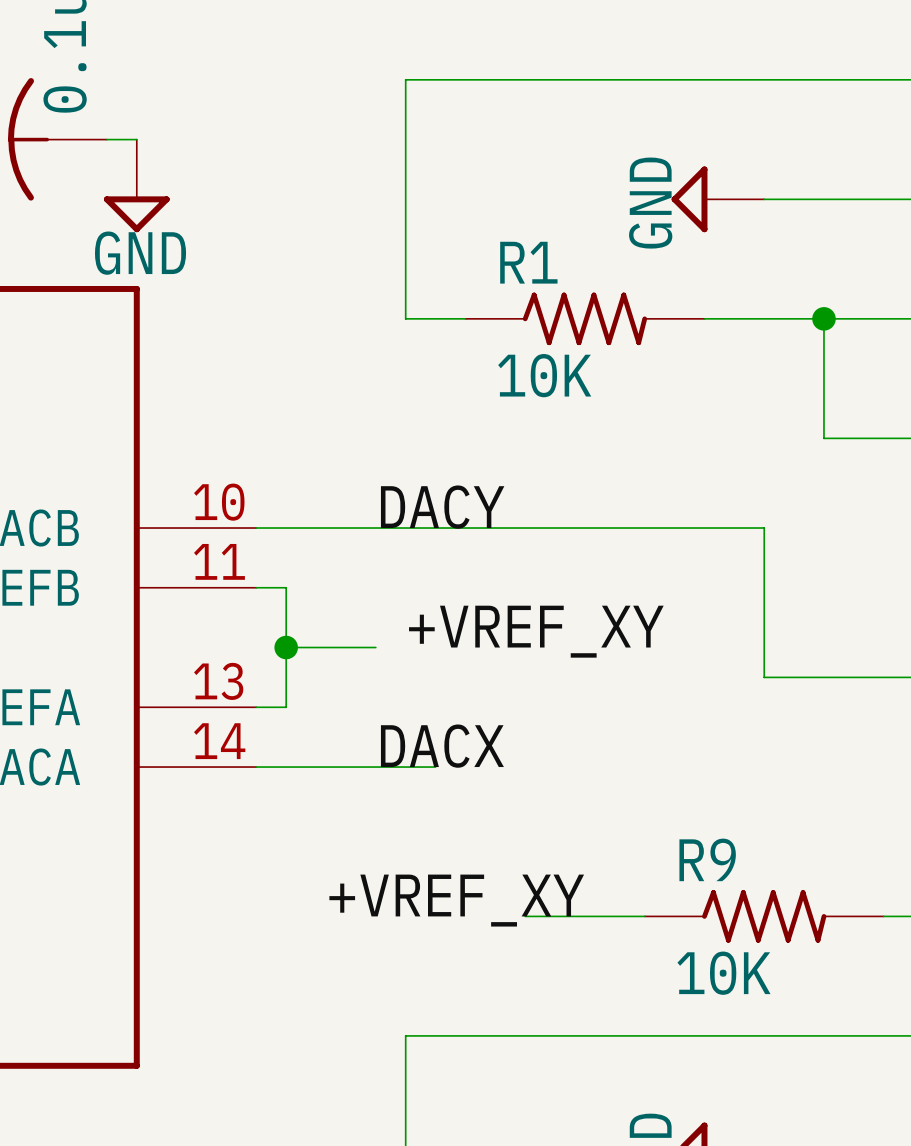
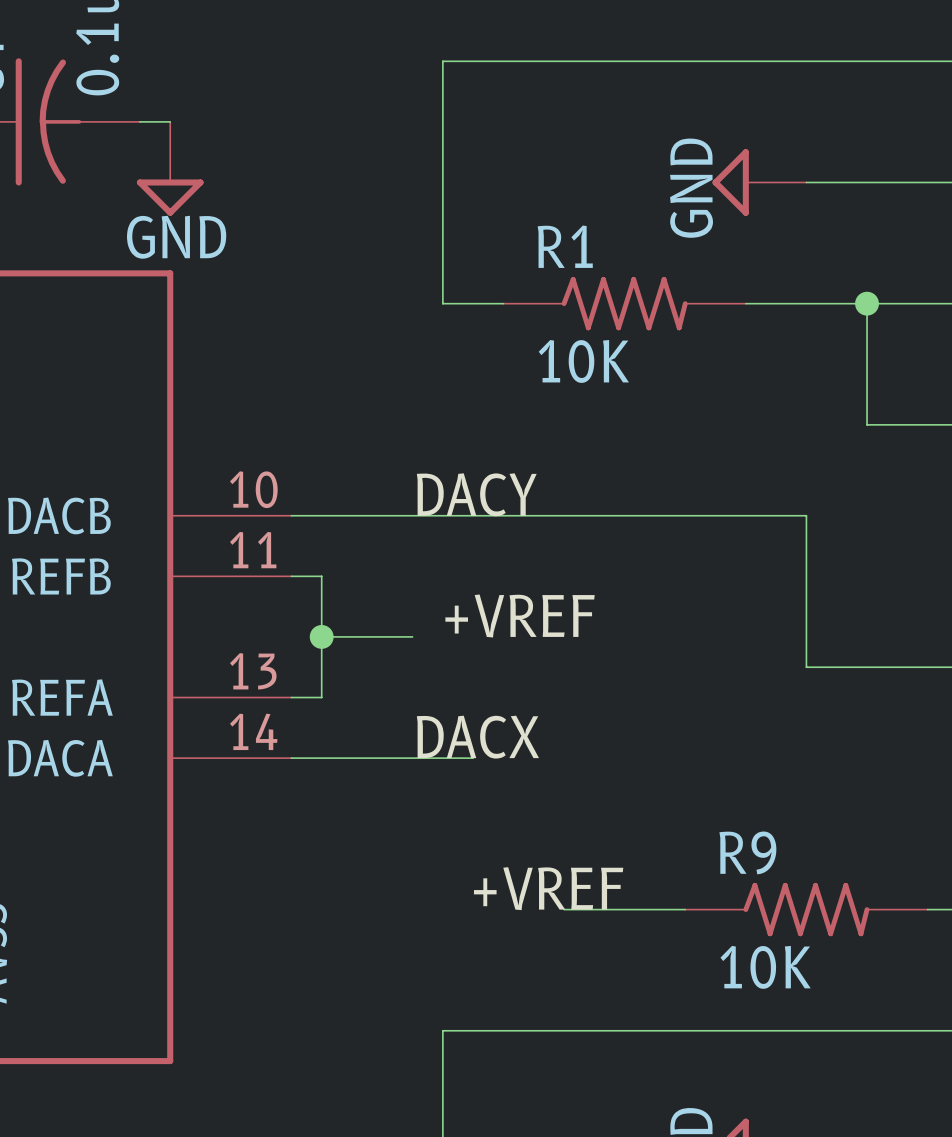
label: +VREF_XY (536, 631) -> +VREF (520, 616)
label: +VREF_XY (456, 900) -> +VREF (548, 888)

